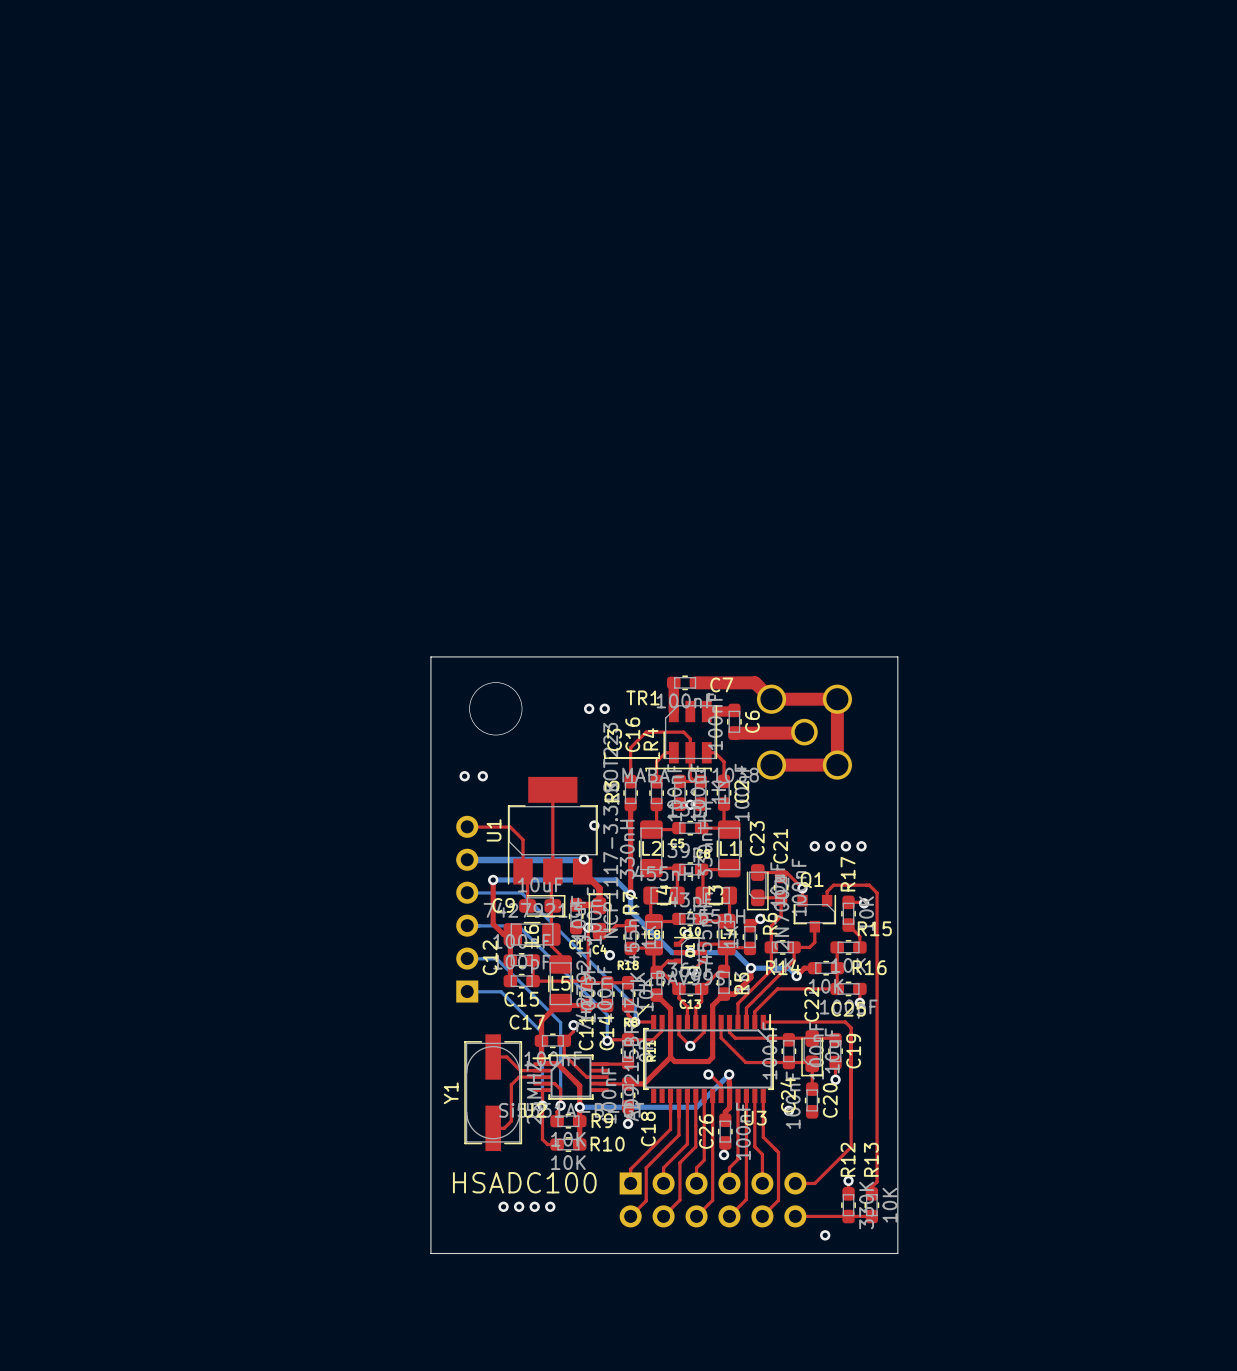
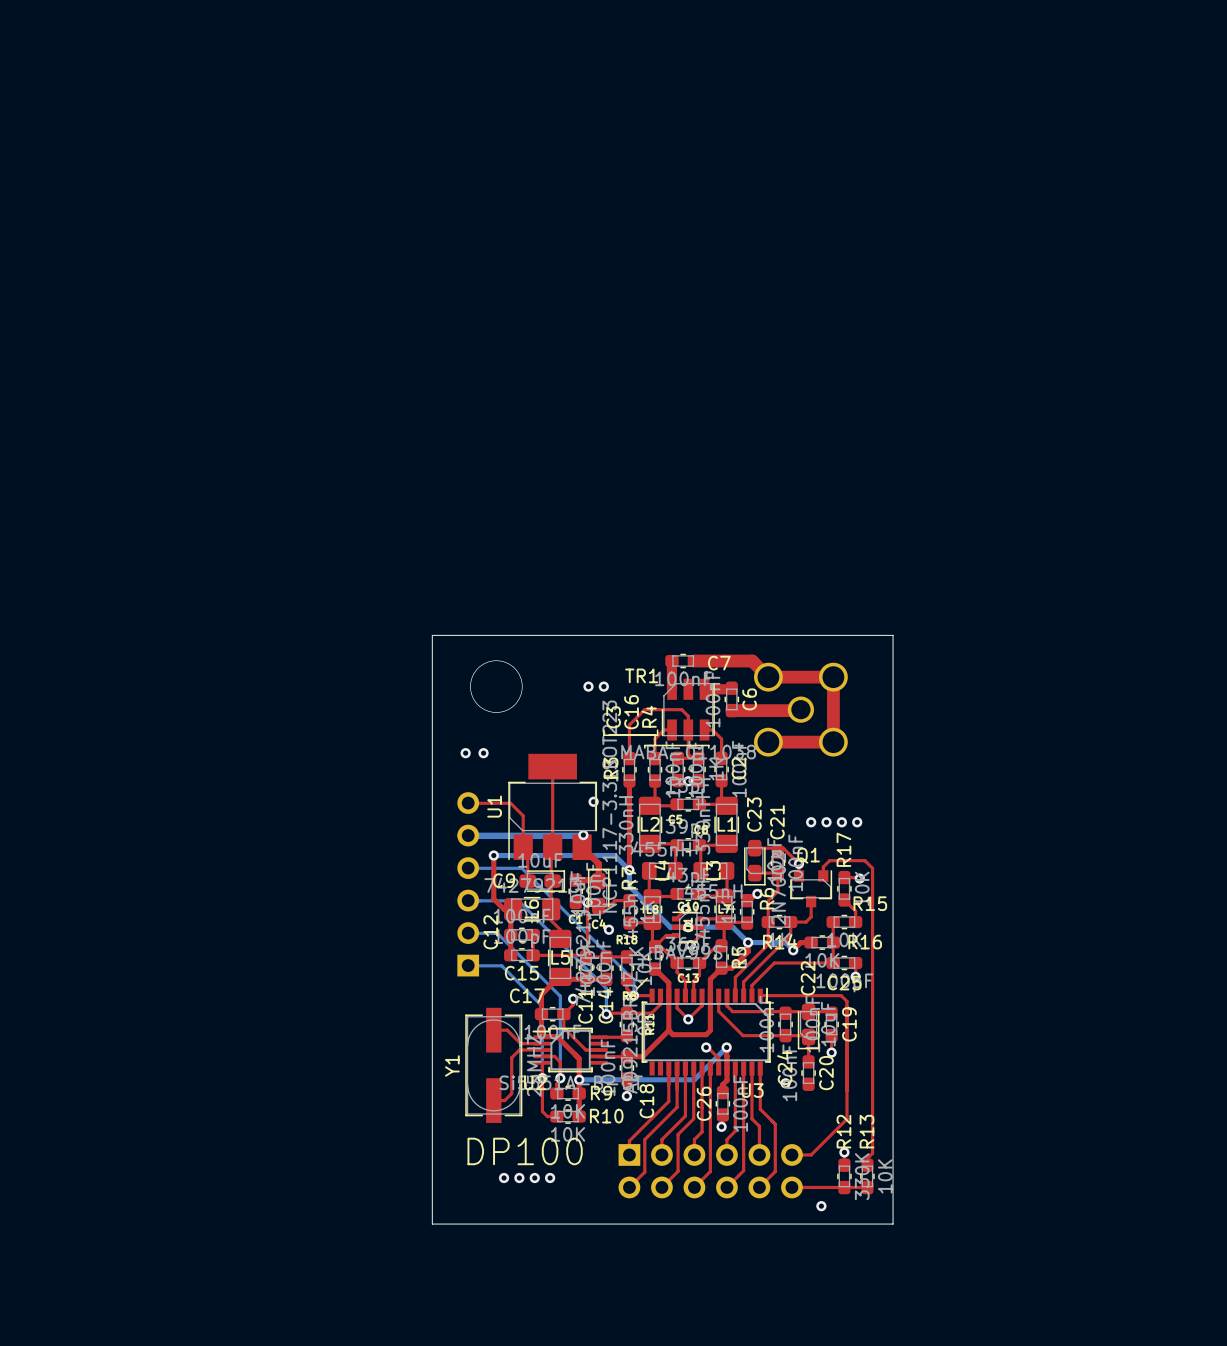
text: HSADC100 (524, 1182) -> DP100 (525, 1151)

